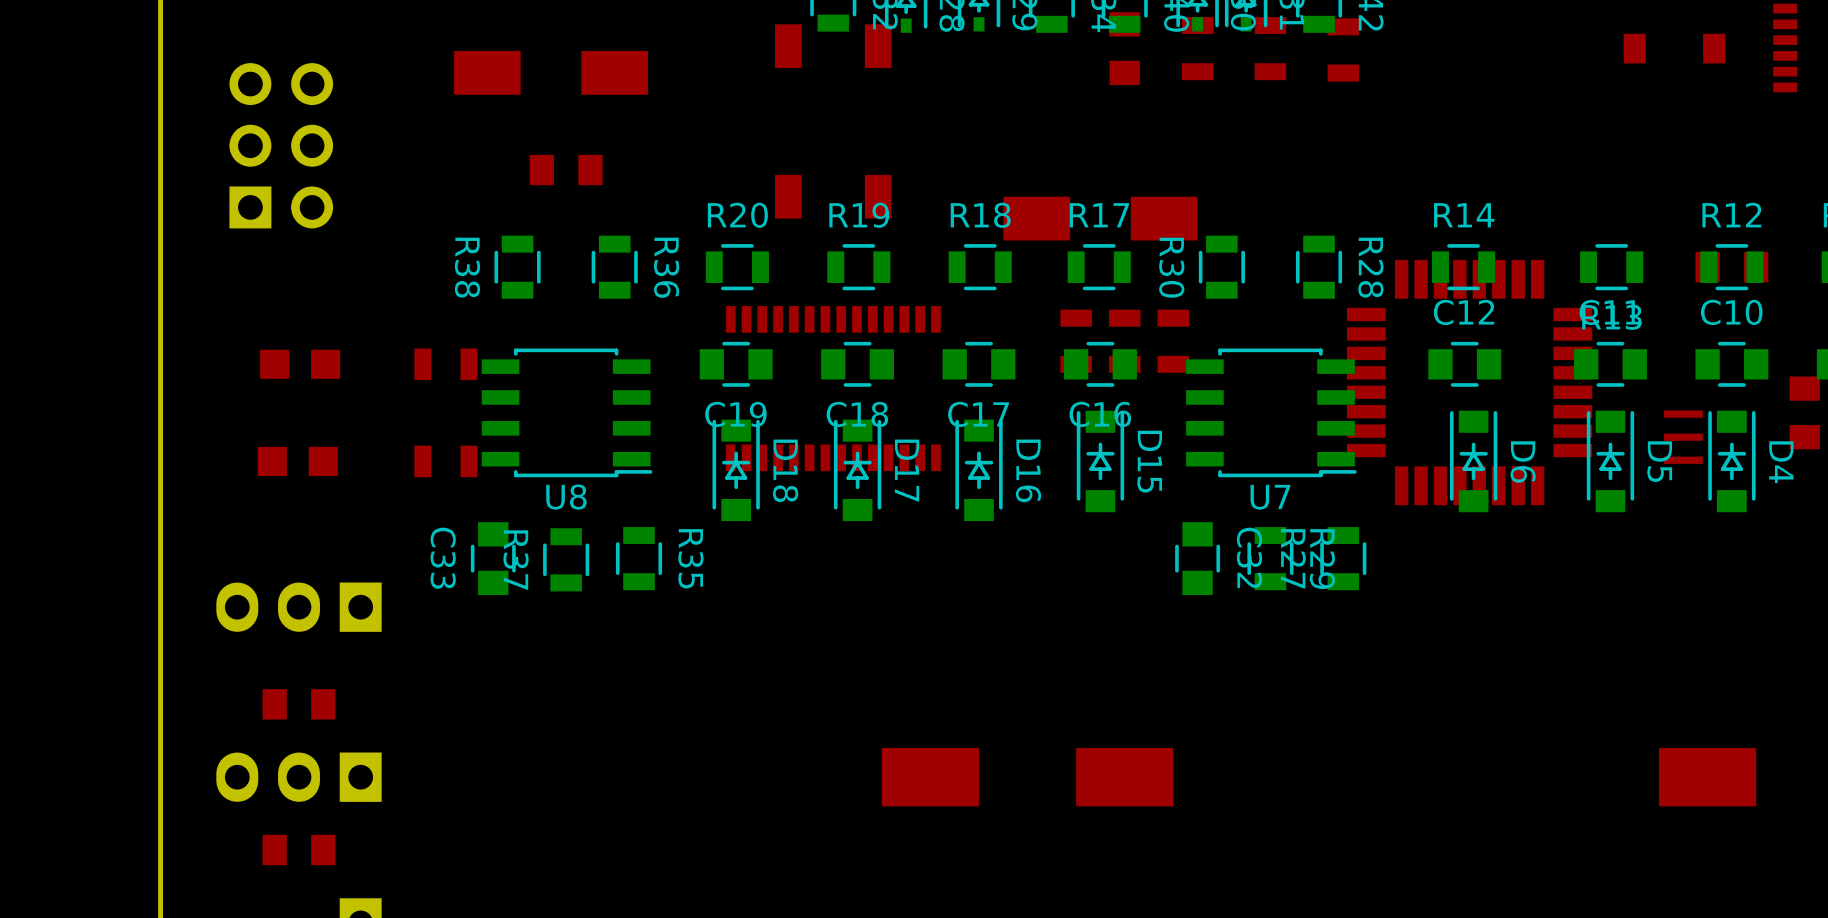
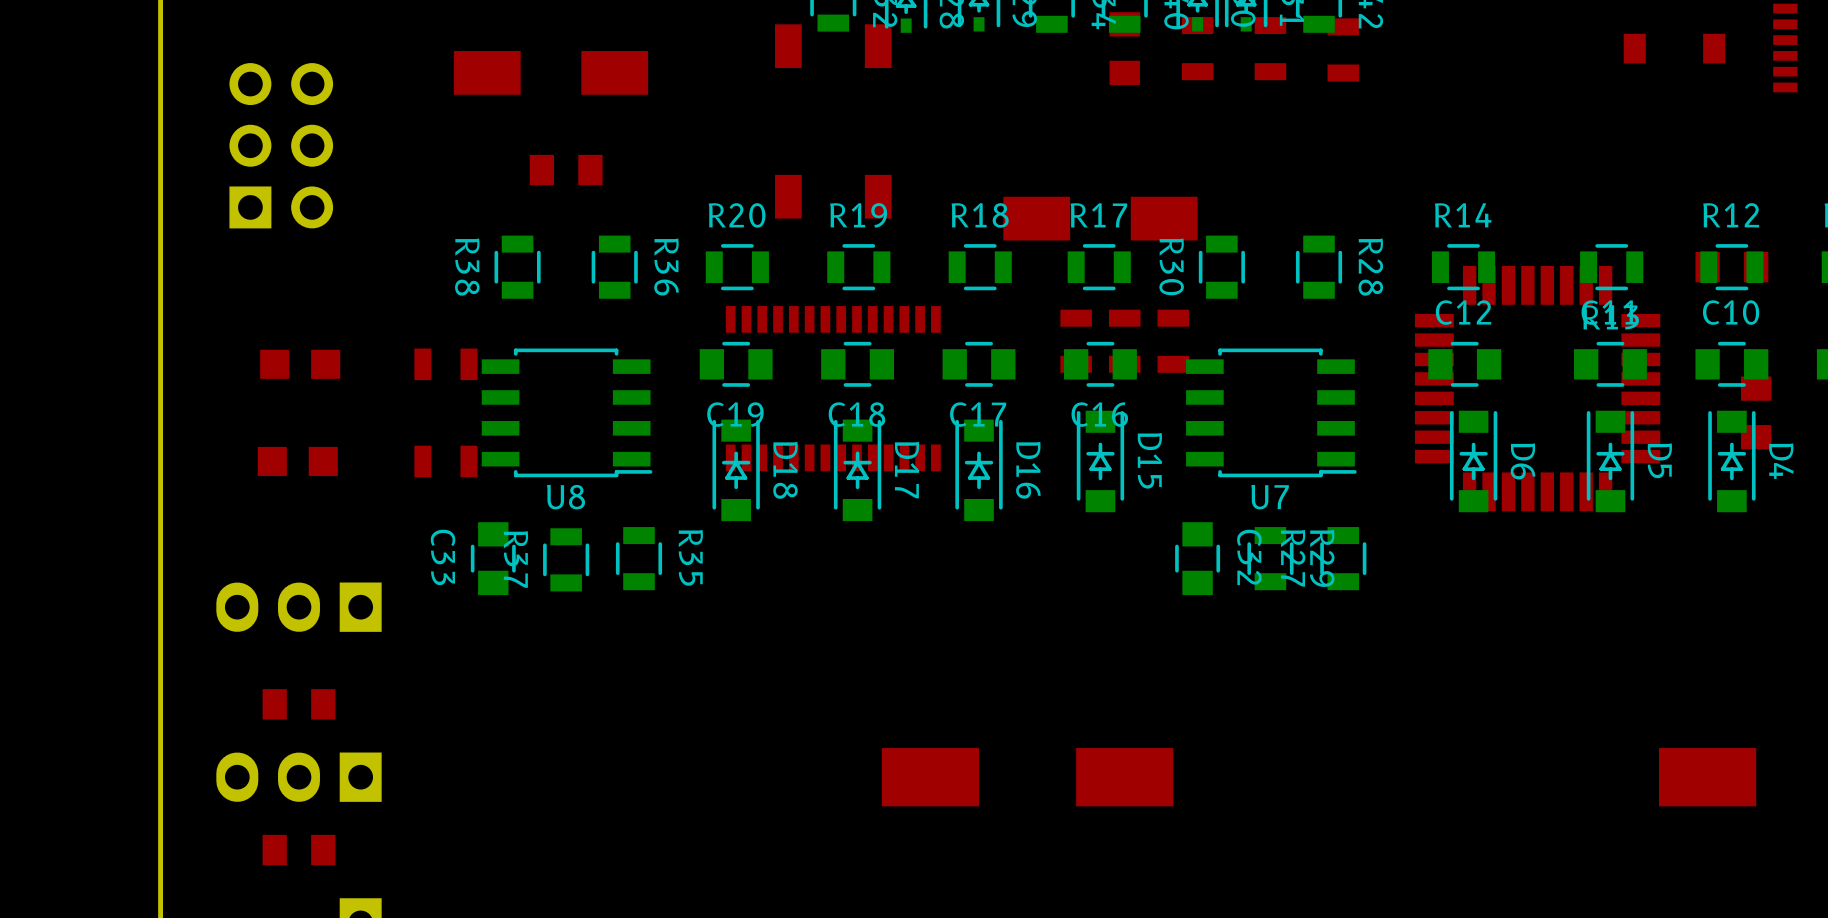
part position: (1469, 382) -> (1537, 388)
part position: (1804, 412) -> (1756, 412)
part: (1683, 437) -> none

